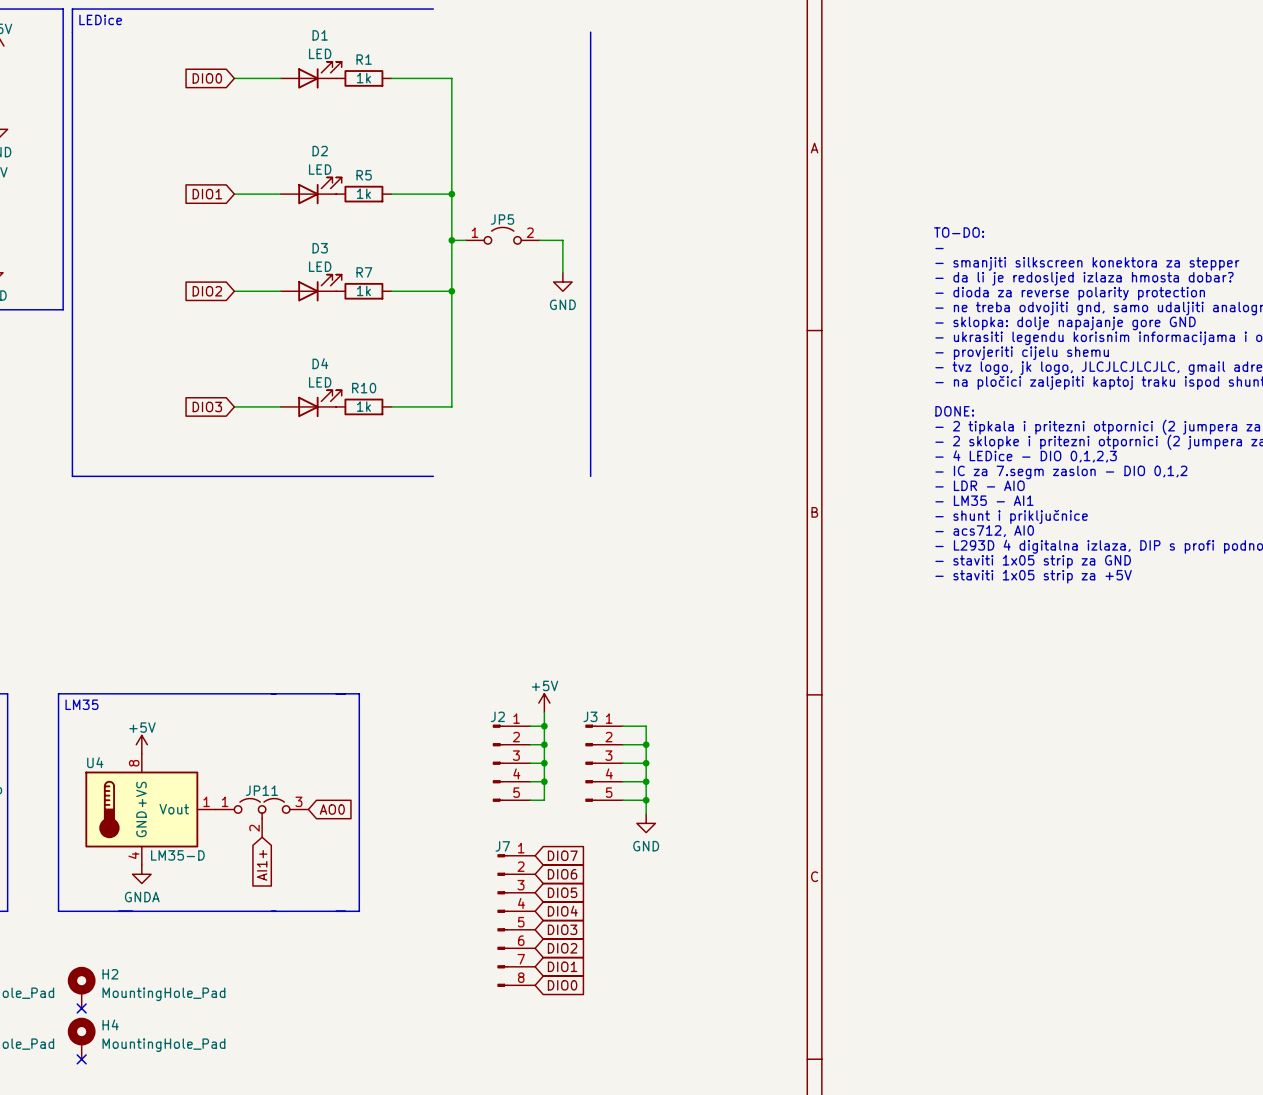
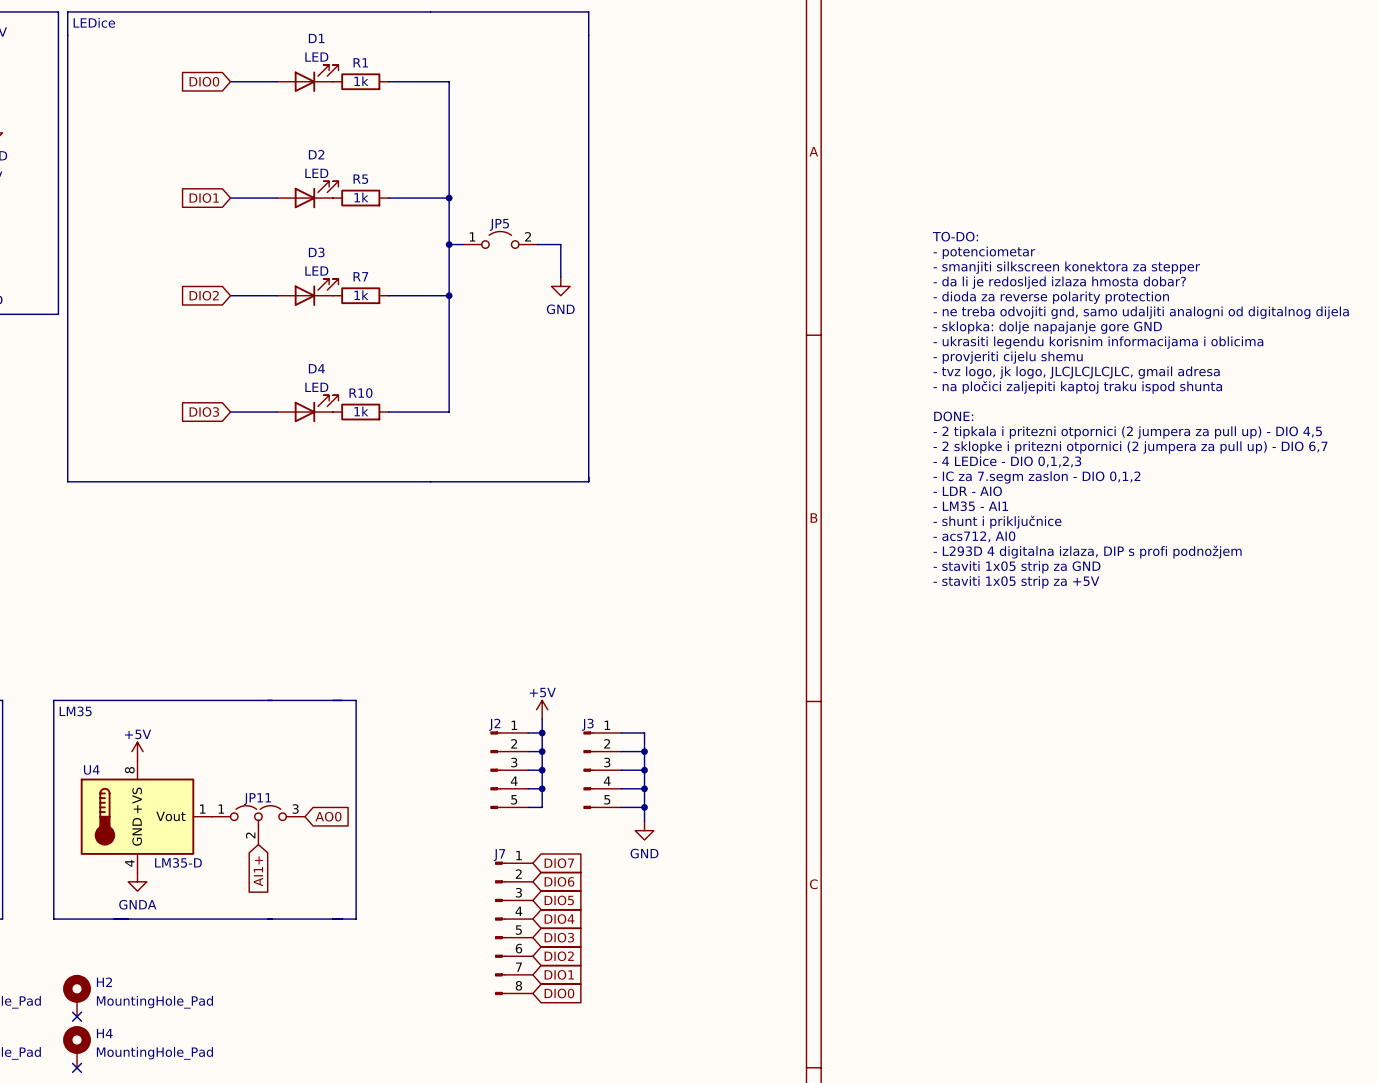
line: none -> (430, 11) (588, 11) (588, 35)
text: - (939, 248) -> - potenciometar (984, 252)
line: none -> (430, 481) (588, 481)

